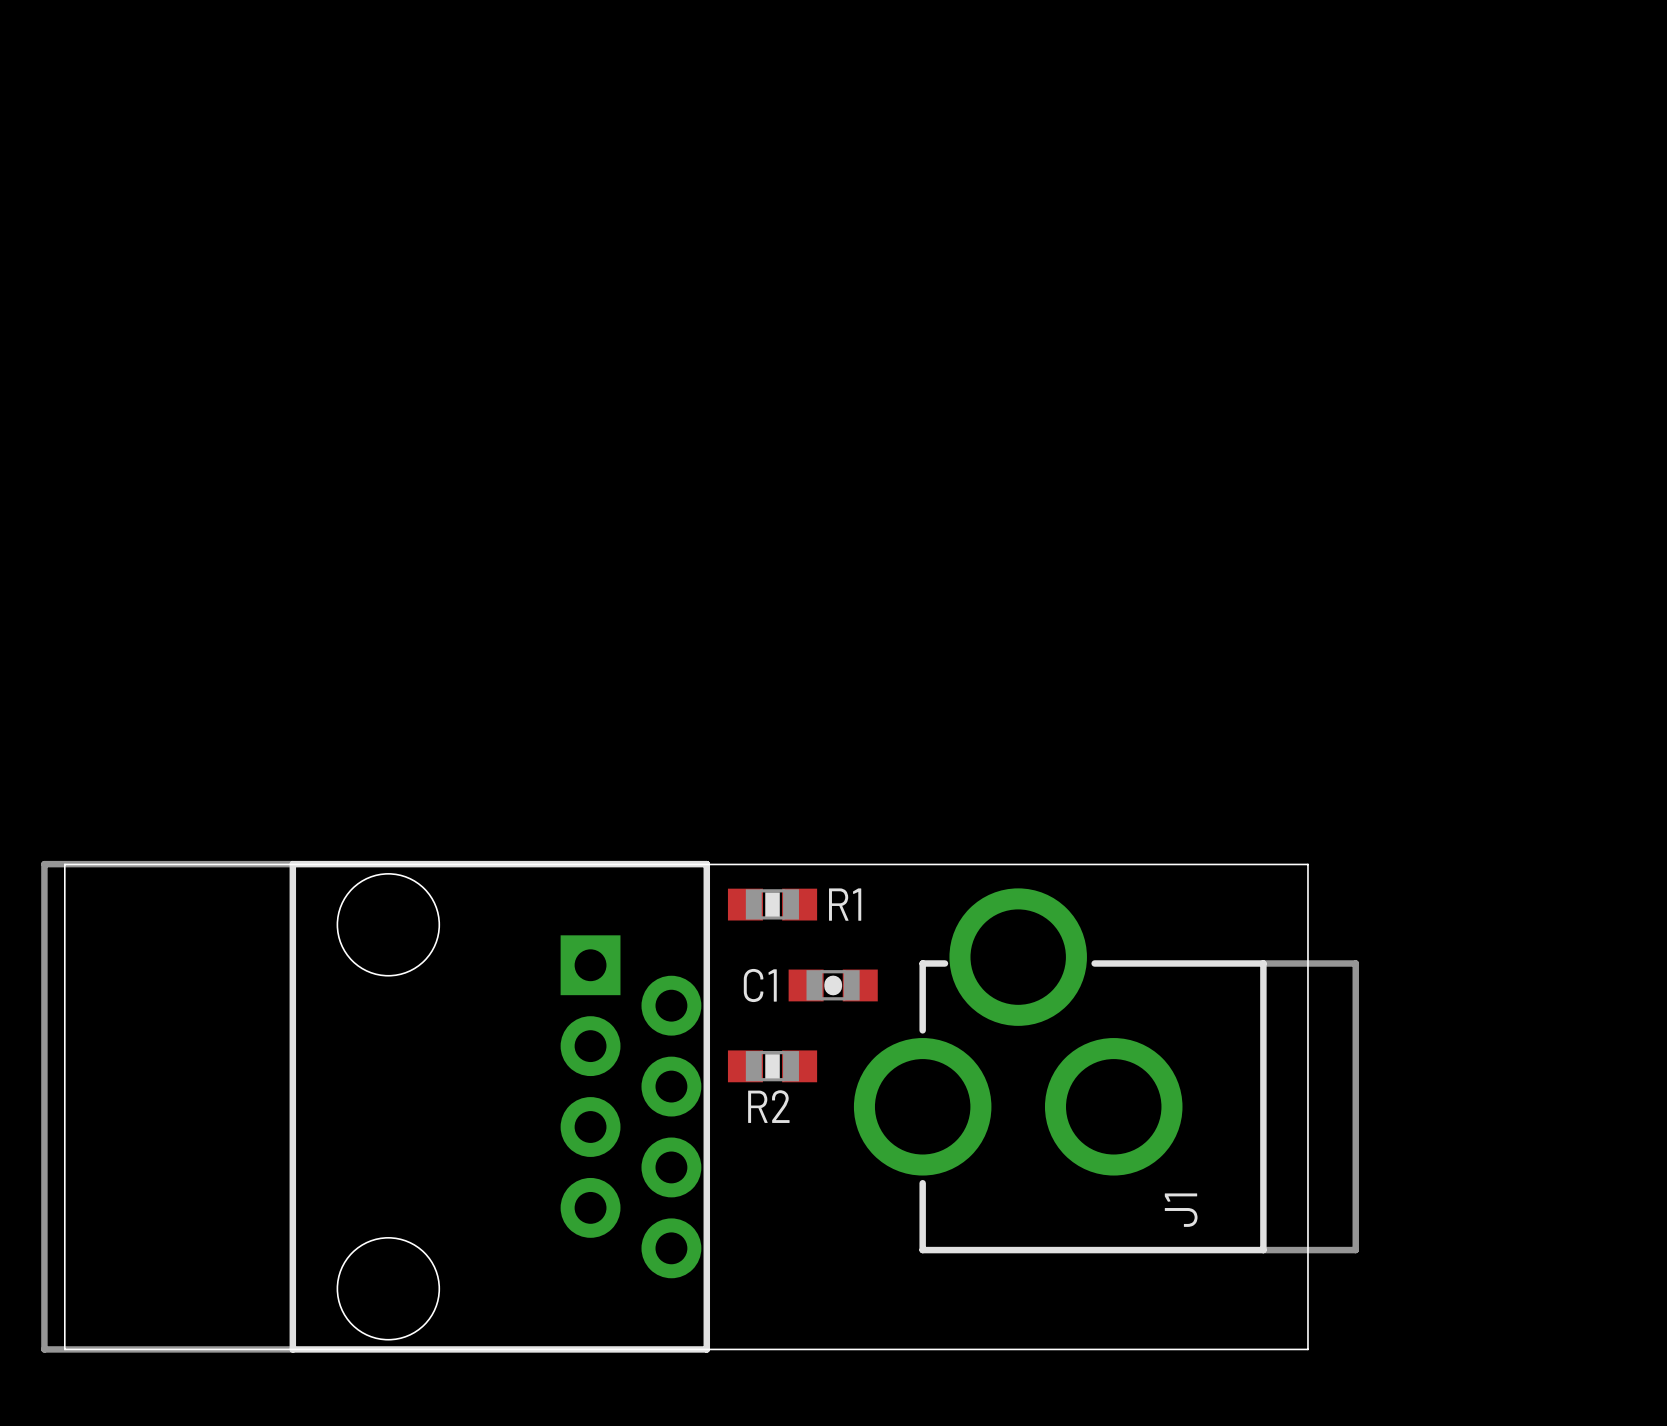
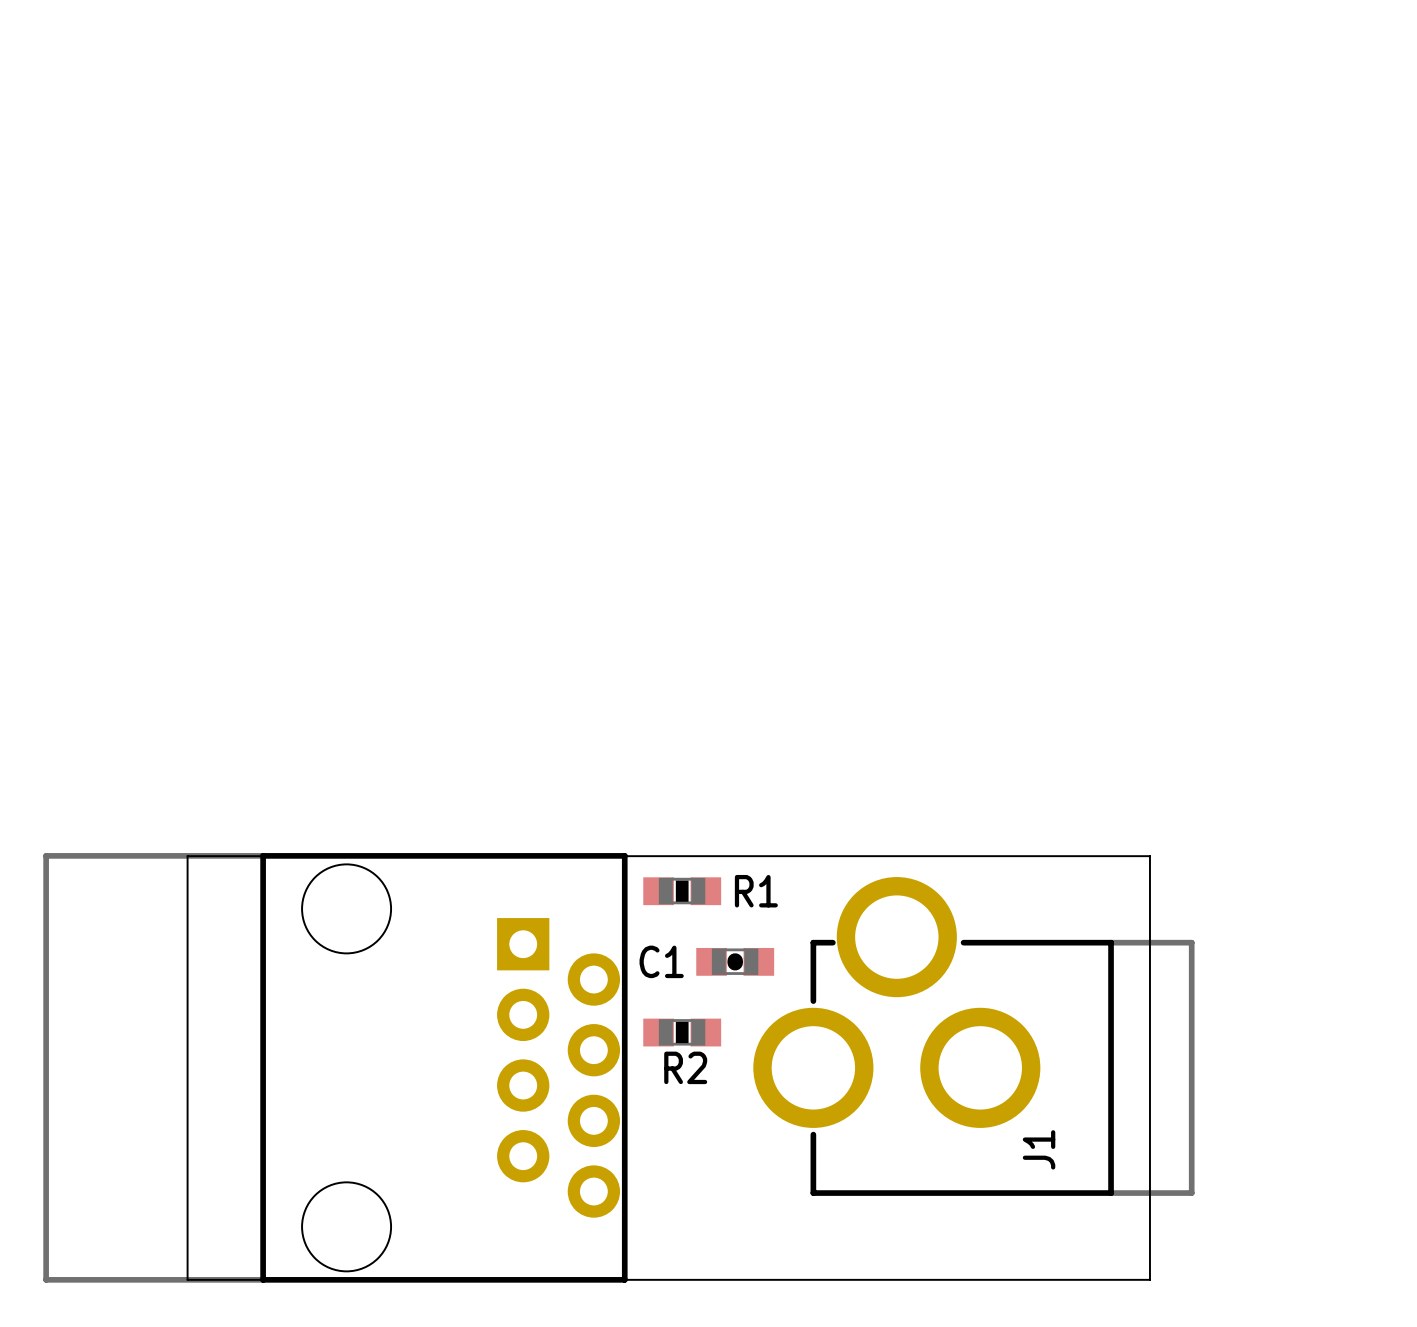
board edge: (206, 864) (64, 864) (64, 1349) (206, 1349) -> (187, 856) (187, 1279)

